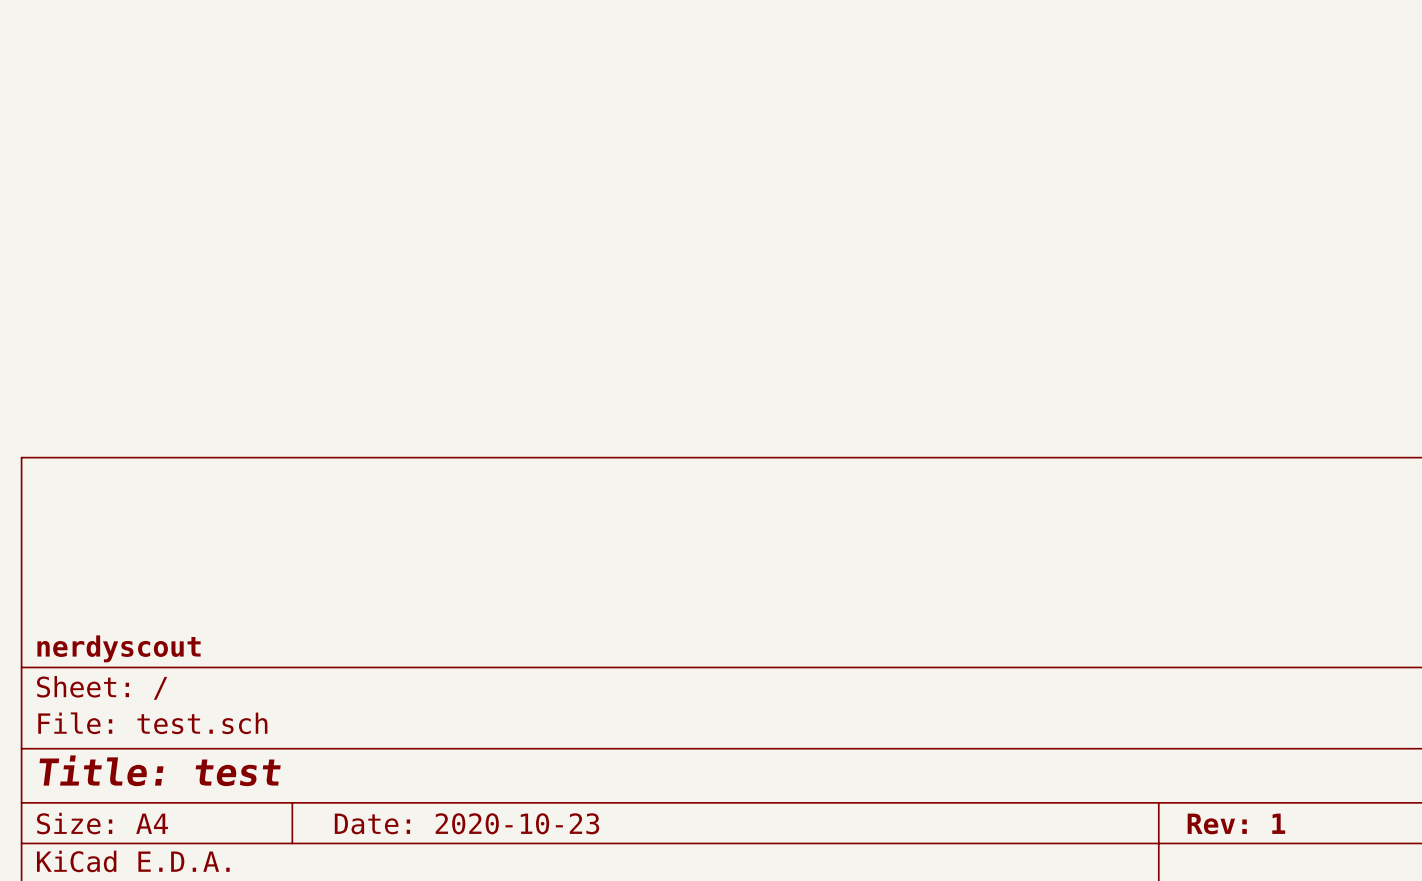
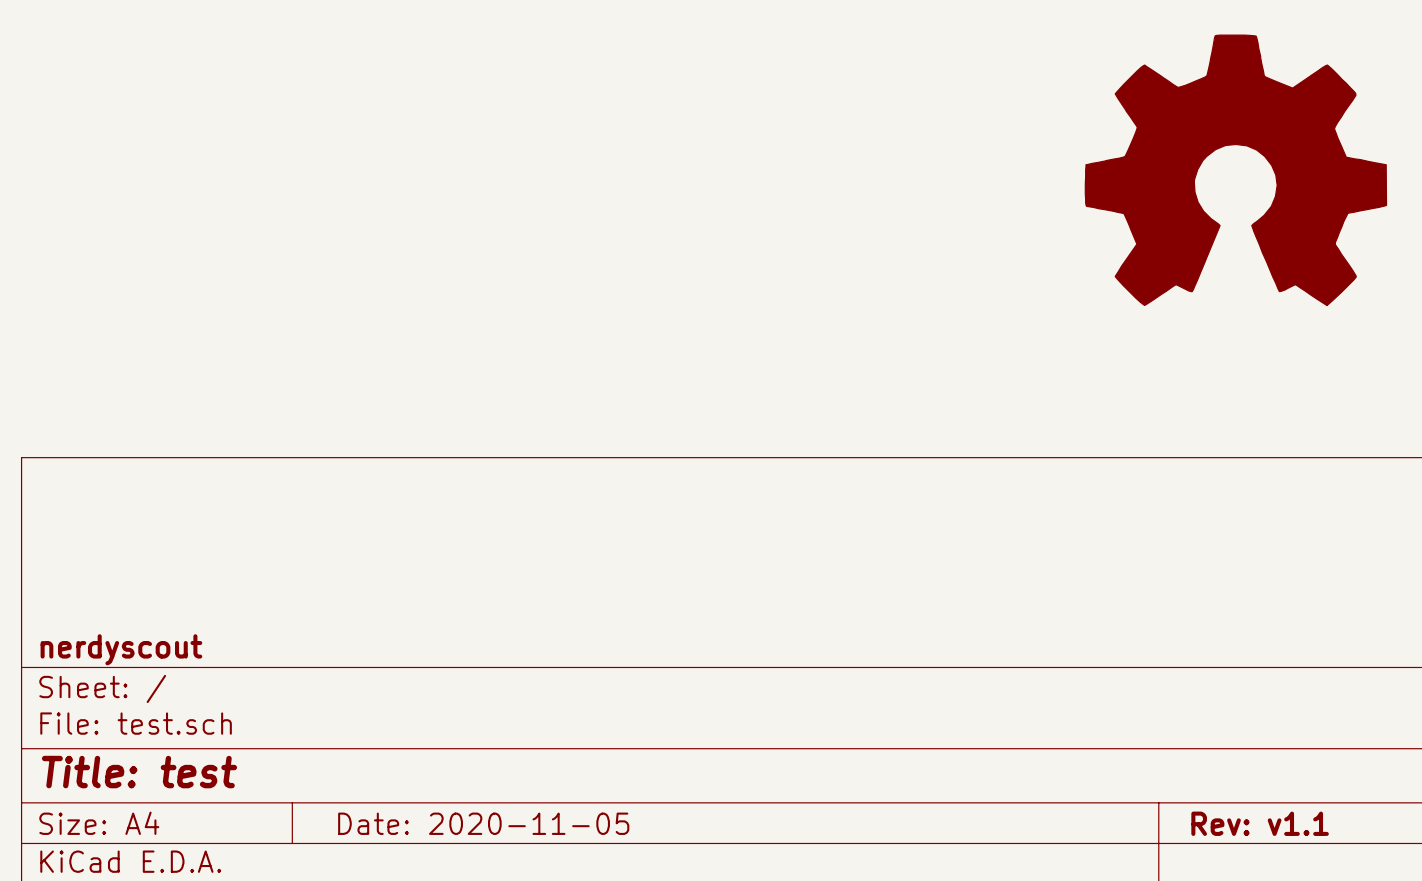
part: none -> (1235, 170)
title block: Date: 2020-10-23 (466, 823) -> Date: 2020-11-05 (483, 823)
title block: Rev: 1 (1236, 823) -> Rev: v1.1 (1260, 823)

